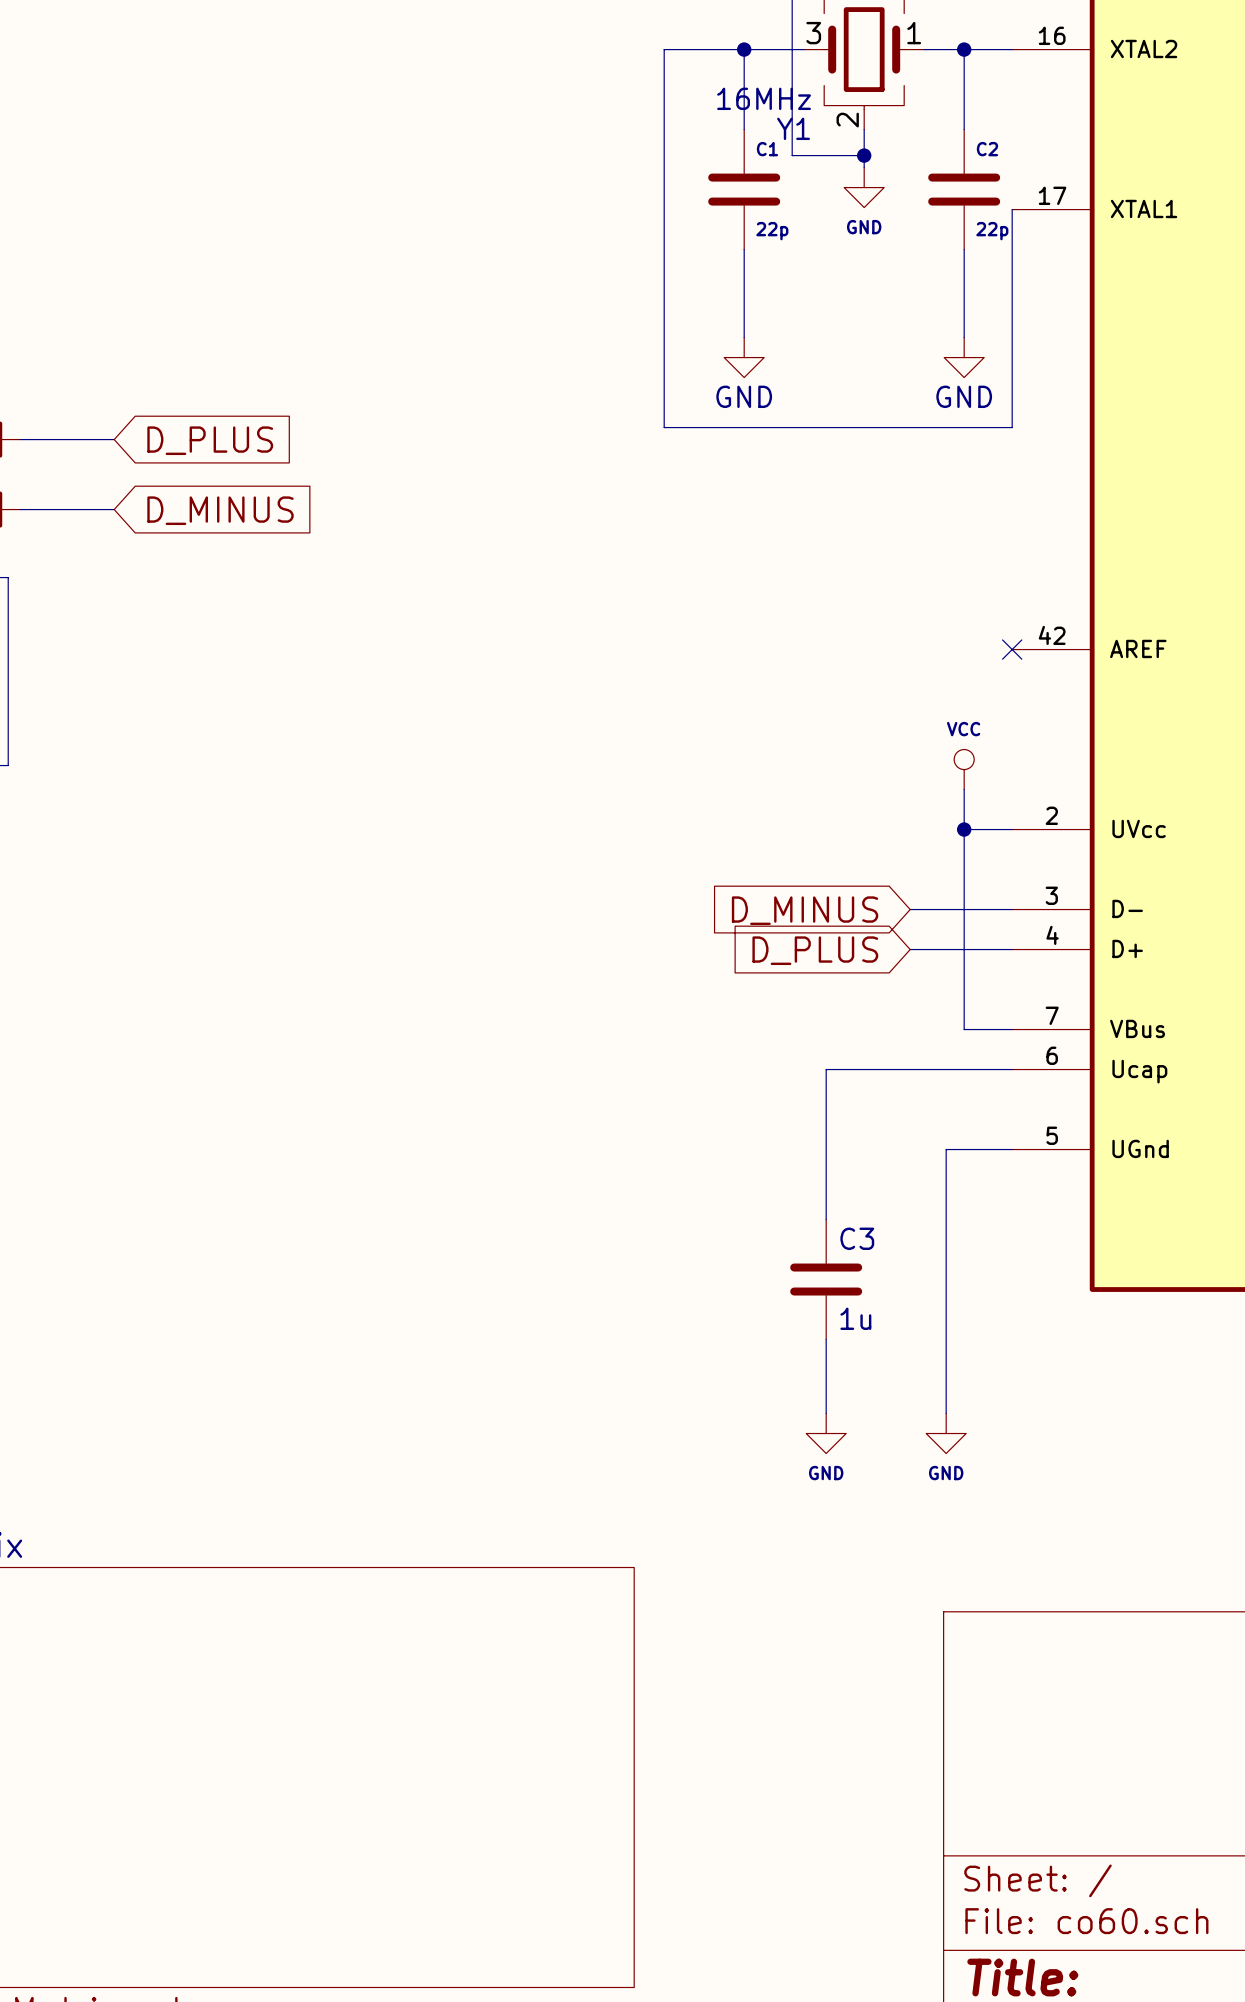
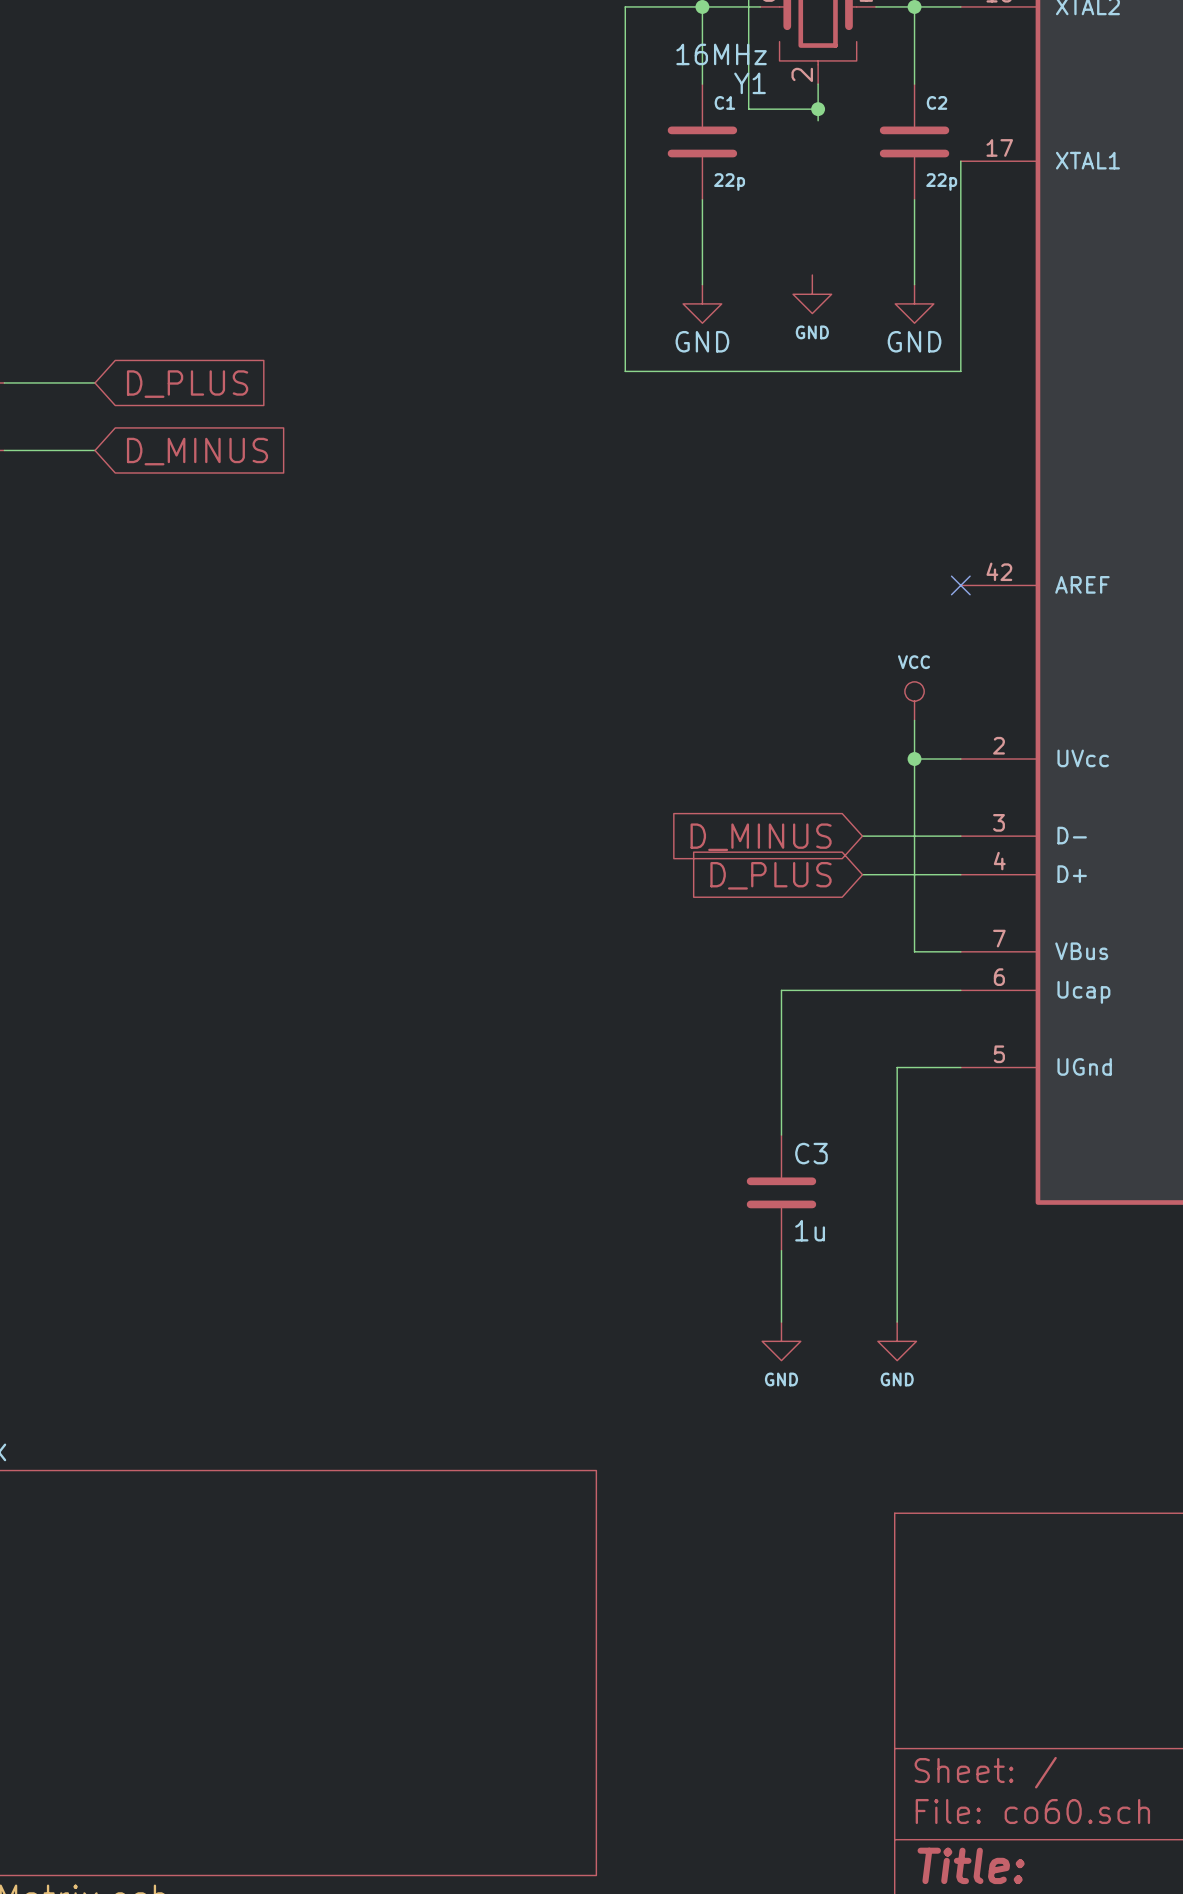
power symbol position: GND (864, 187) -> GND (812, 294)

